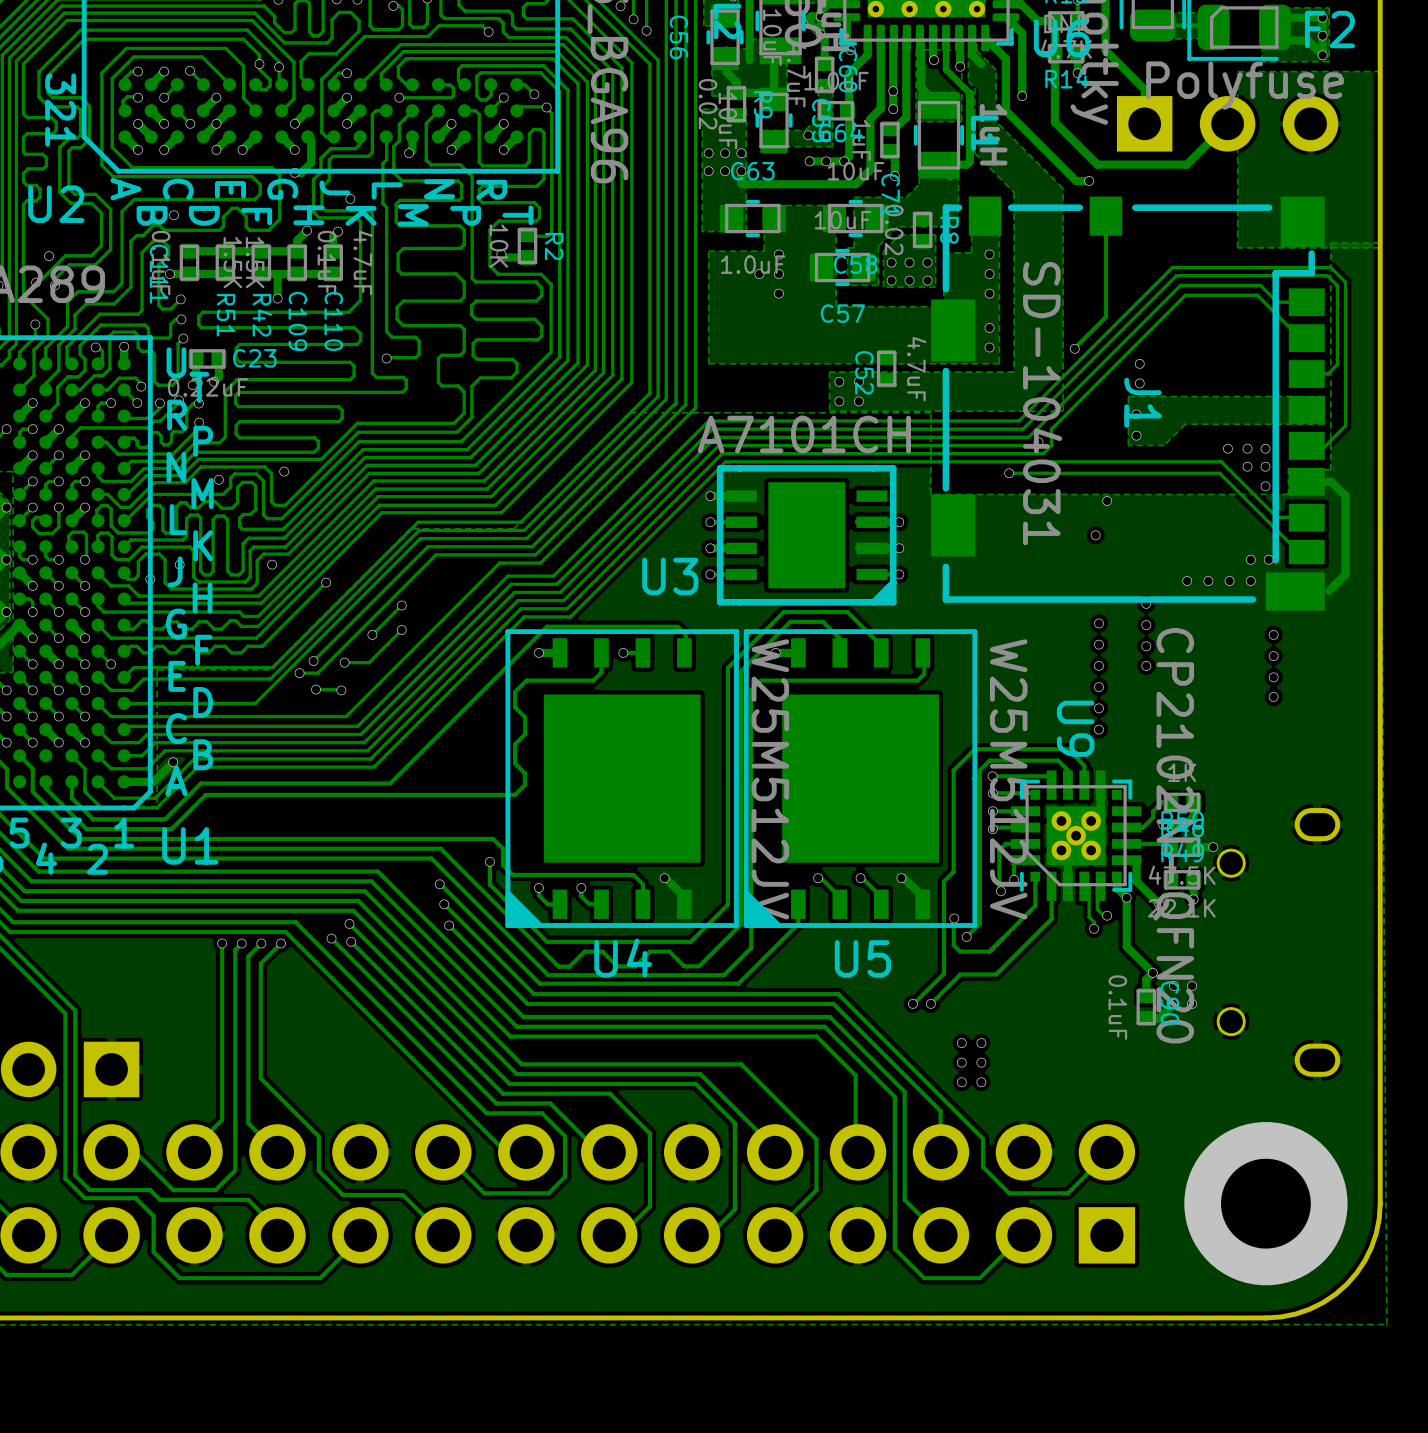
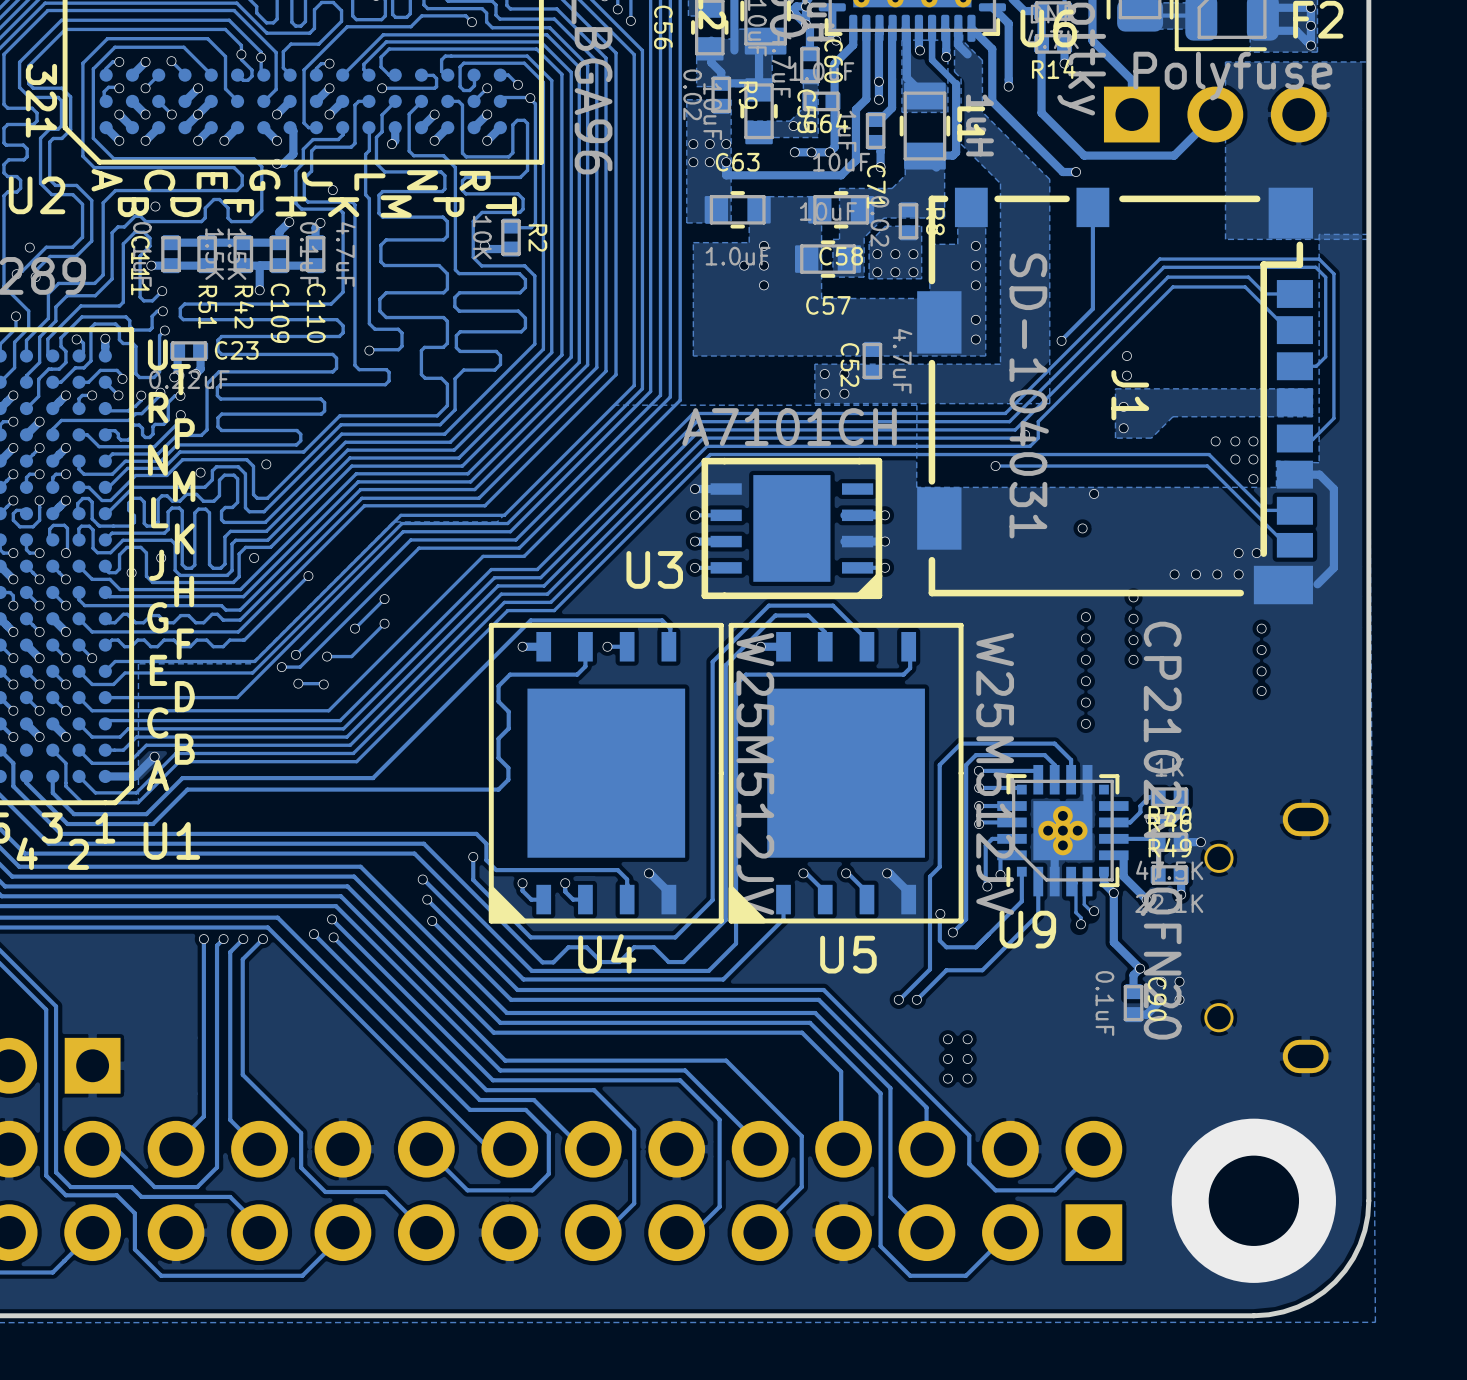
U9 name rotation: 0° (1075, 728) -> 90° counterclockwise (1027, 929)
U9 name position: U9 (1075, 728) -> U9 (1027, 929)
U9 footprint: [1010, 770, 1142, 902] -> [997, 764, 1129, 897]

